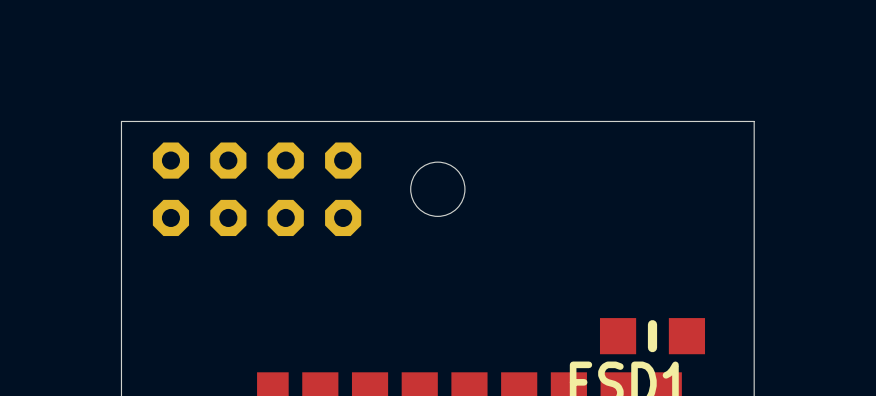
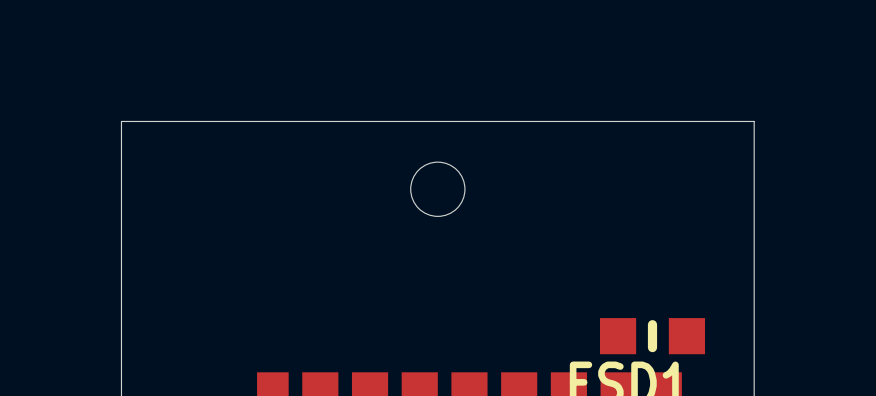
part: (257, 189) -> none

